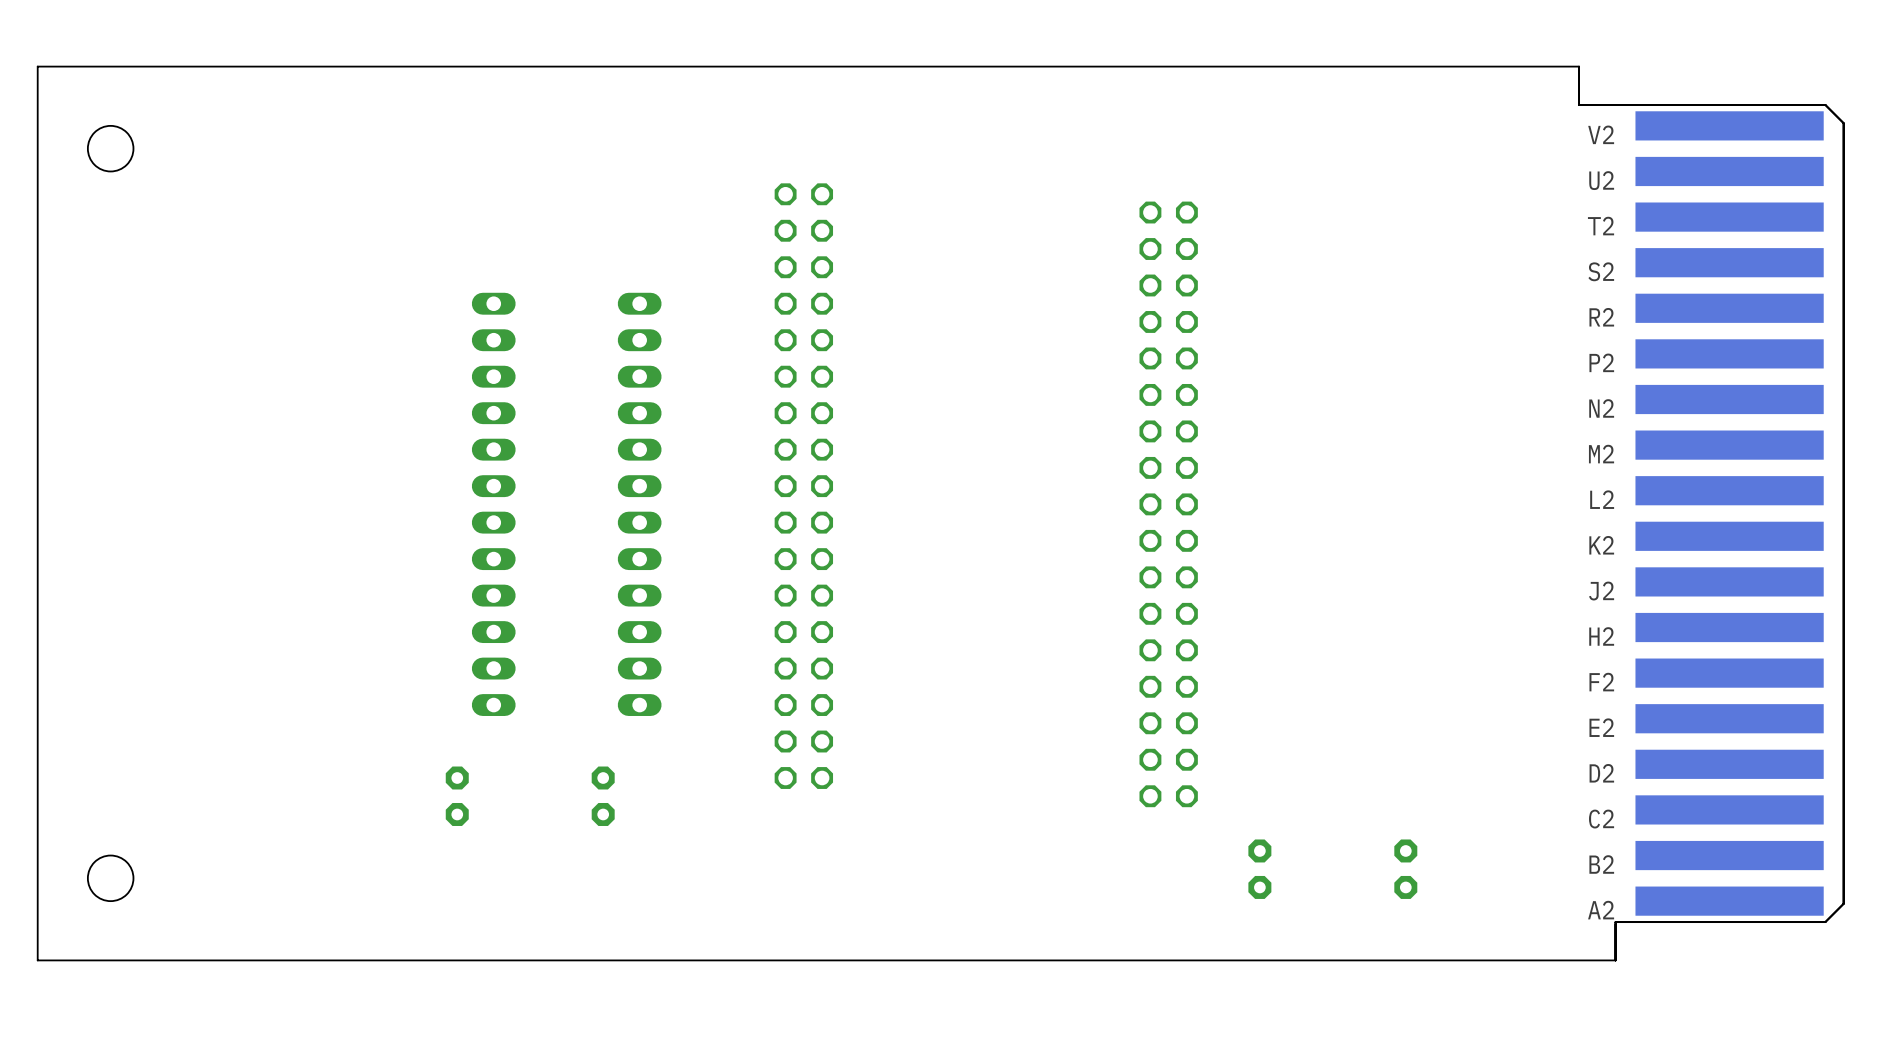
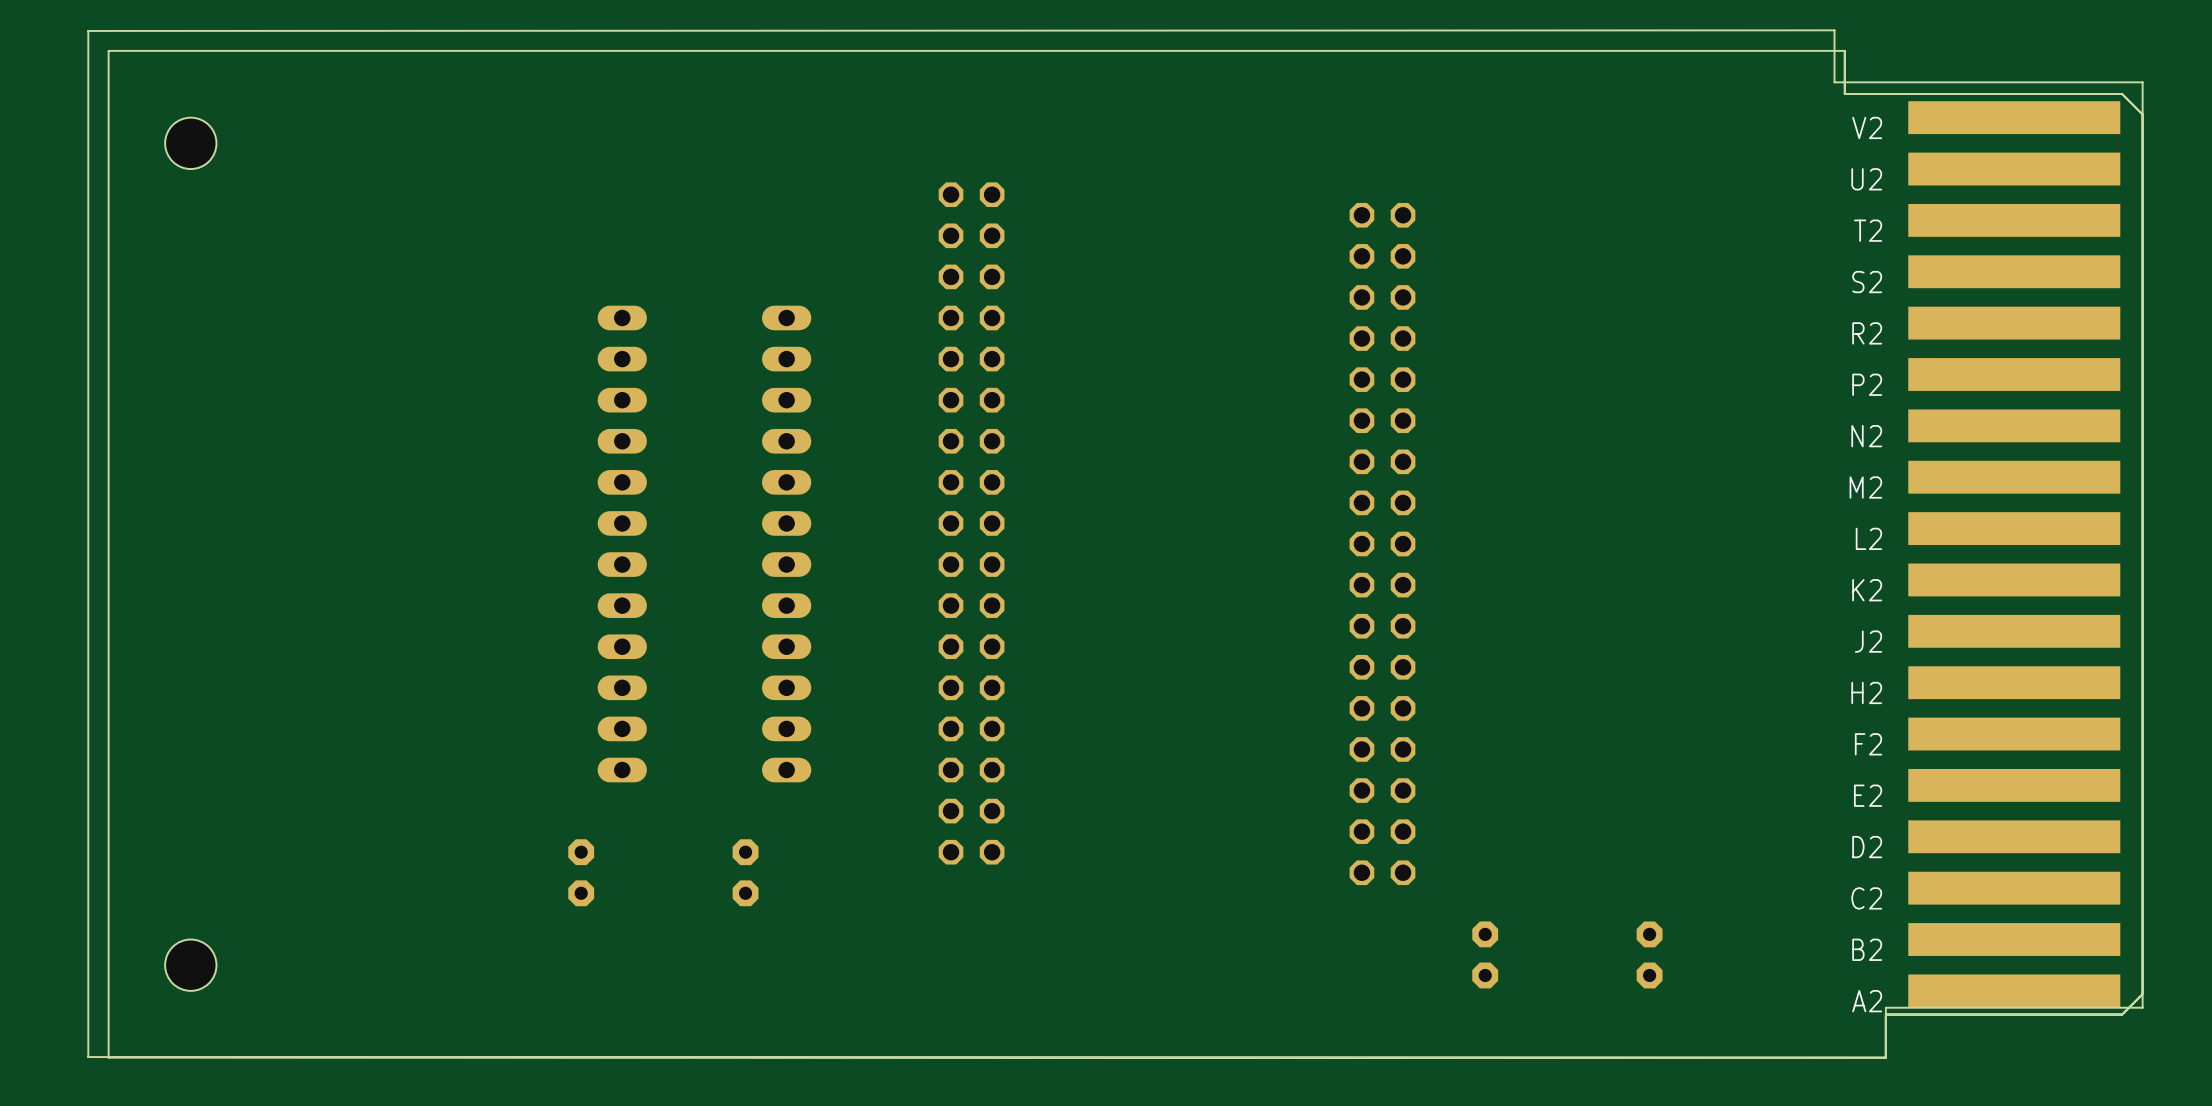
board edge: none -> (1834, 30) (88, 30) (88, 1057) (1885, 1057) (1885, 1007) (2142, 1007) (2142, 82) (1834, 82) (1834, 30)

